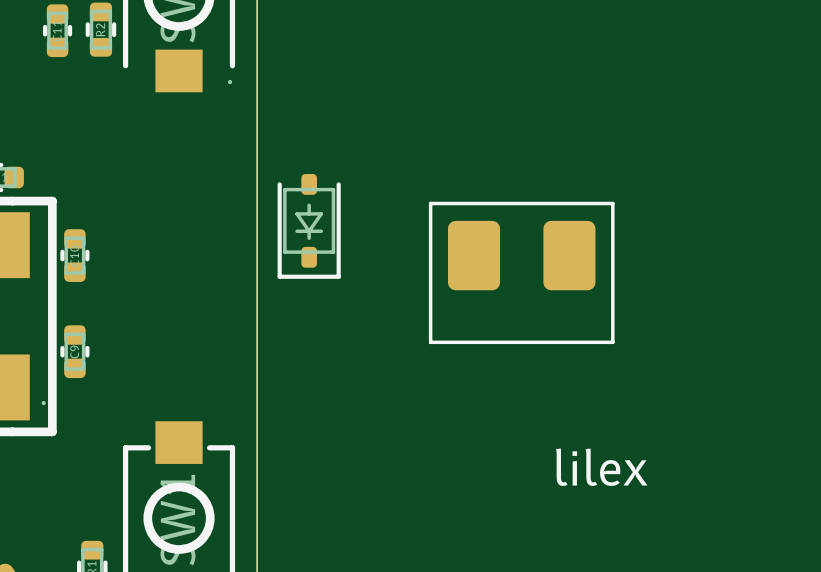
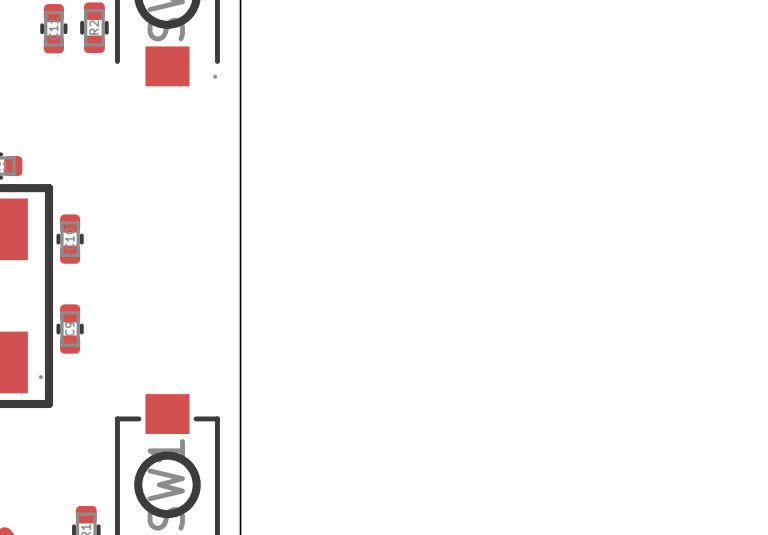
line: (430, 203) (612, 203) (612, 342) (430, 342) (430, 203) -> none
part: (309, 226) -> none
part: (474, 255) -> none
part: (569, 255) -> none
text: lilex (601, 467) -> none

